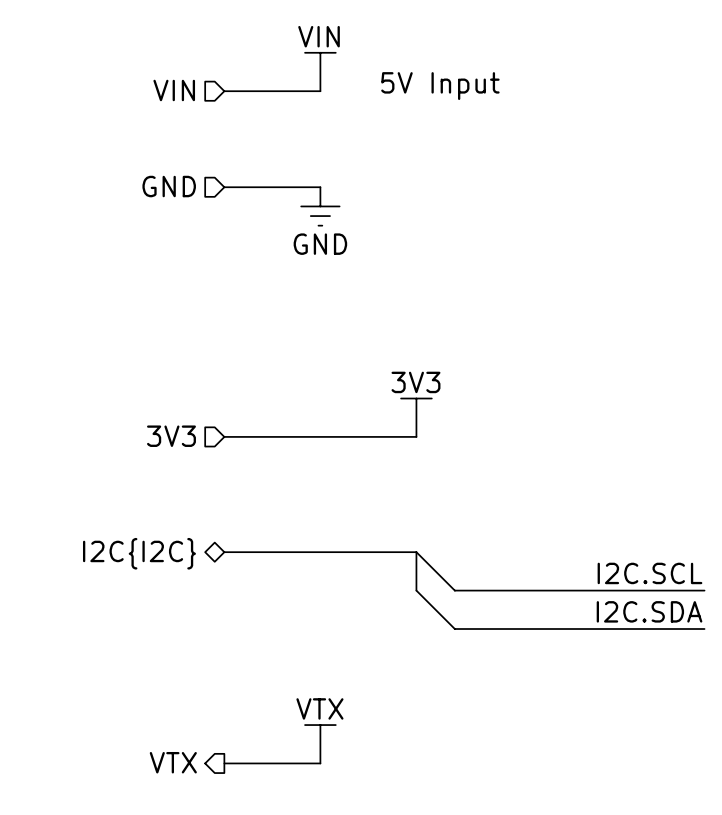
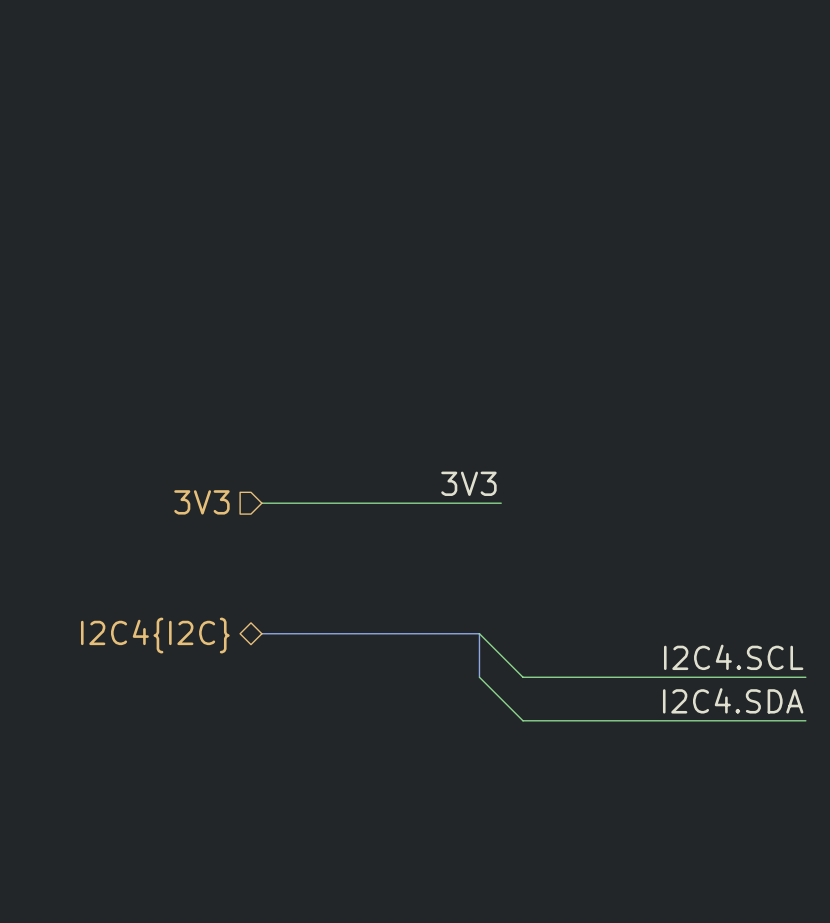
power symbol: VIN (320, 72) -> none
text: 5V Input (440, 86) -> none
hierarchical label: VIN (174, 90) -> none
wire: (224, 91) (320, 91) -> none
hierarchical label: GND (169, 186) -> none
wire: (224, 187) (320, 187) -> none
power symbol: GND (320, 206) -> none
power symbol: 3V3 (416, 417) -> none
label: none -> 3V3 (468, 483)
wire: none -> (479, 503) (501, 503)
hierarchical label: I2C{I2C} (139, 553) -> I2C4{I2C} (155, 635)
label: I2C.SCL (649, 573) -> I2C4.SCL (733, 657)
label: I2C.SDA (649, 611) -> I2C4.SDA (733, 700)
power symbol: VTX (320, 744) -> none
hierarchical label: VTX (173, 762) -> none
wire: (224, 763) (320, 763) -> none

